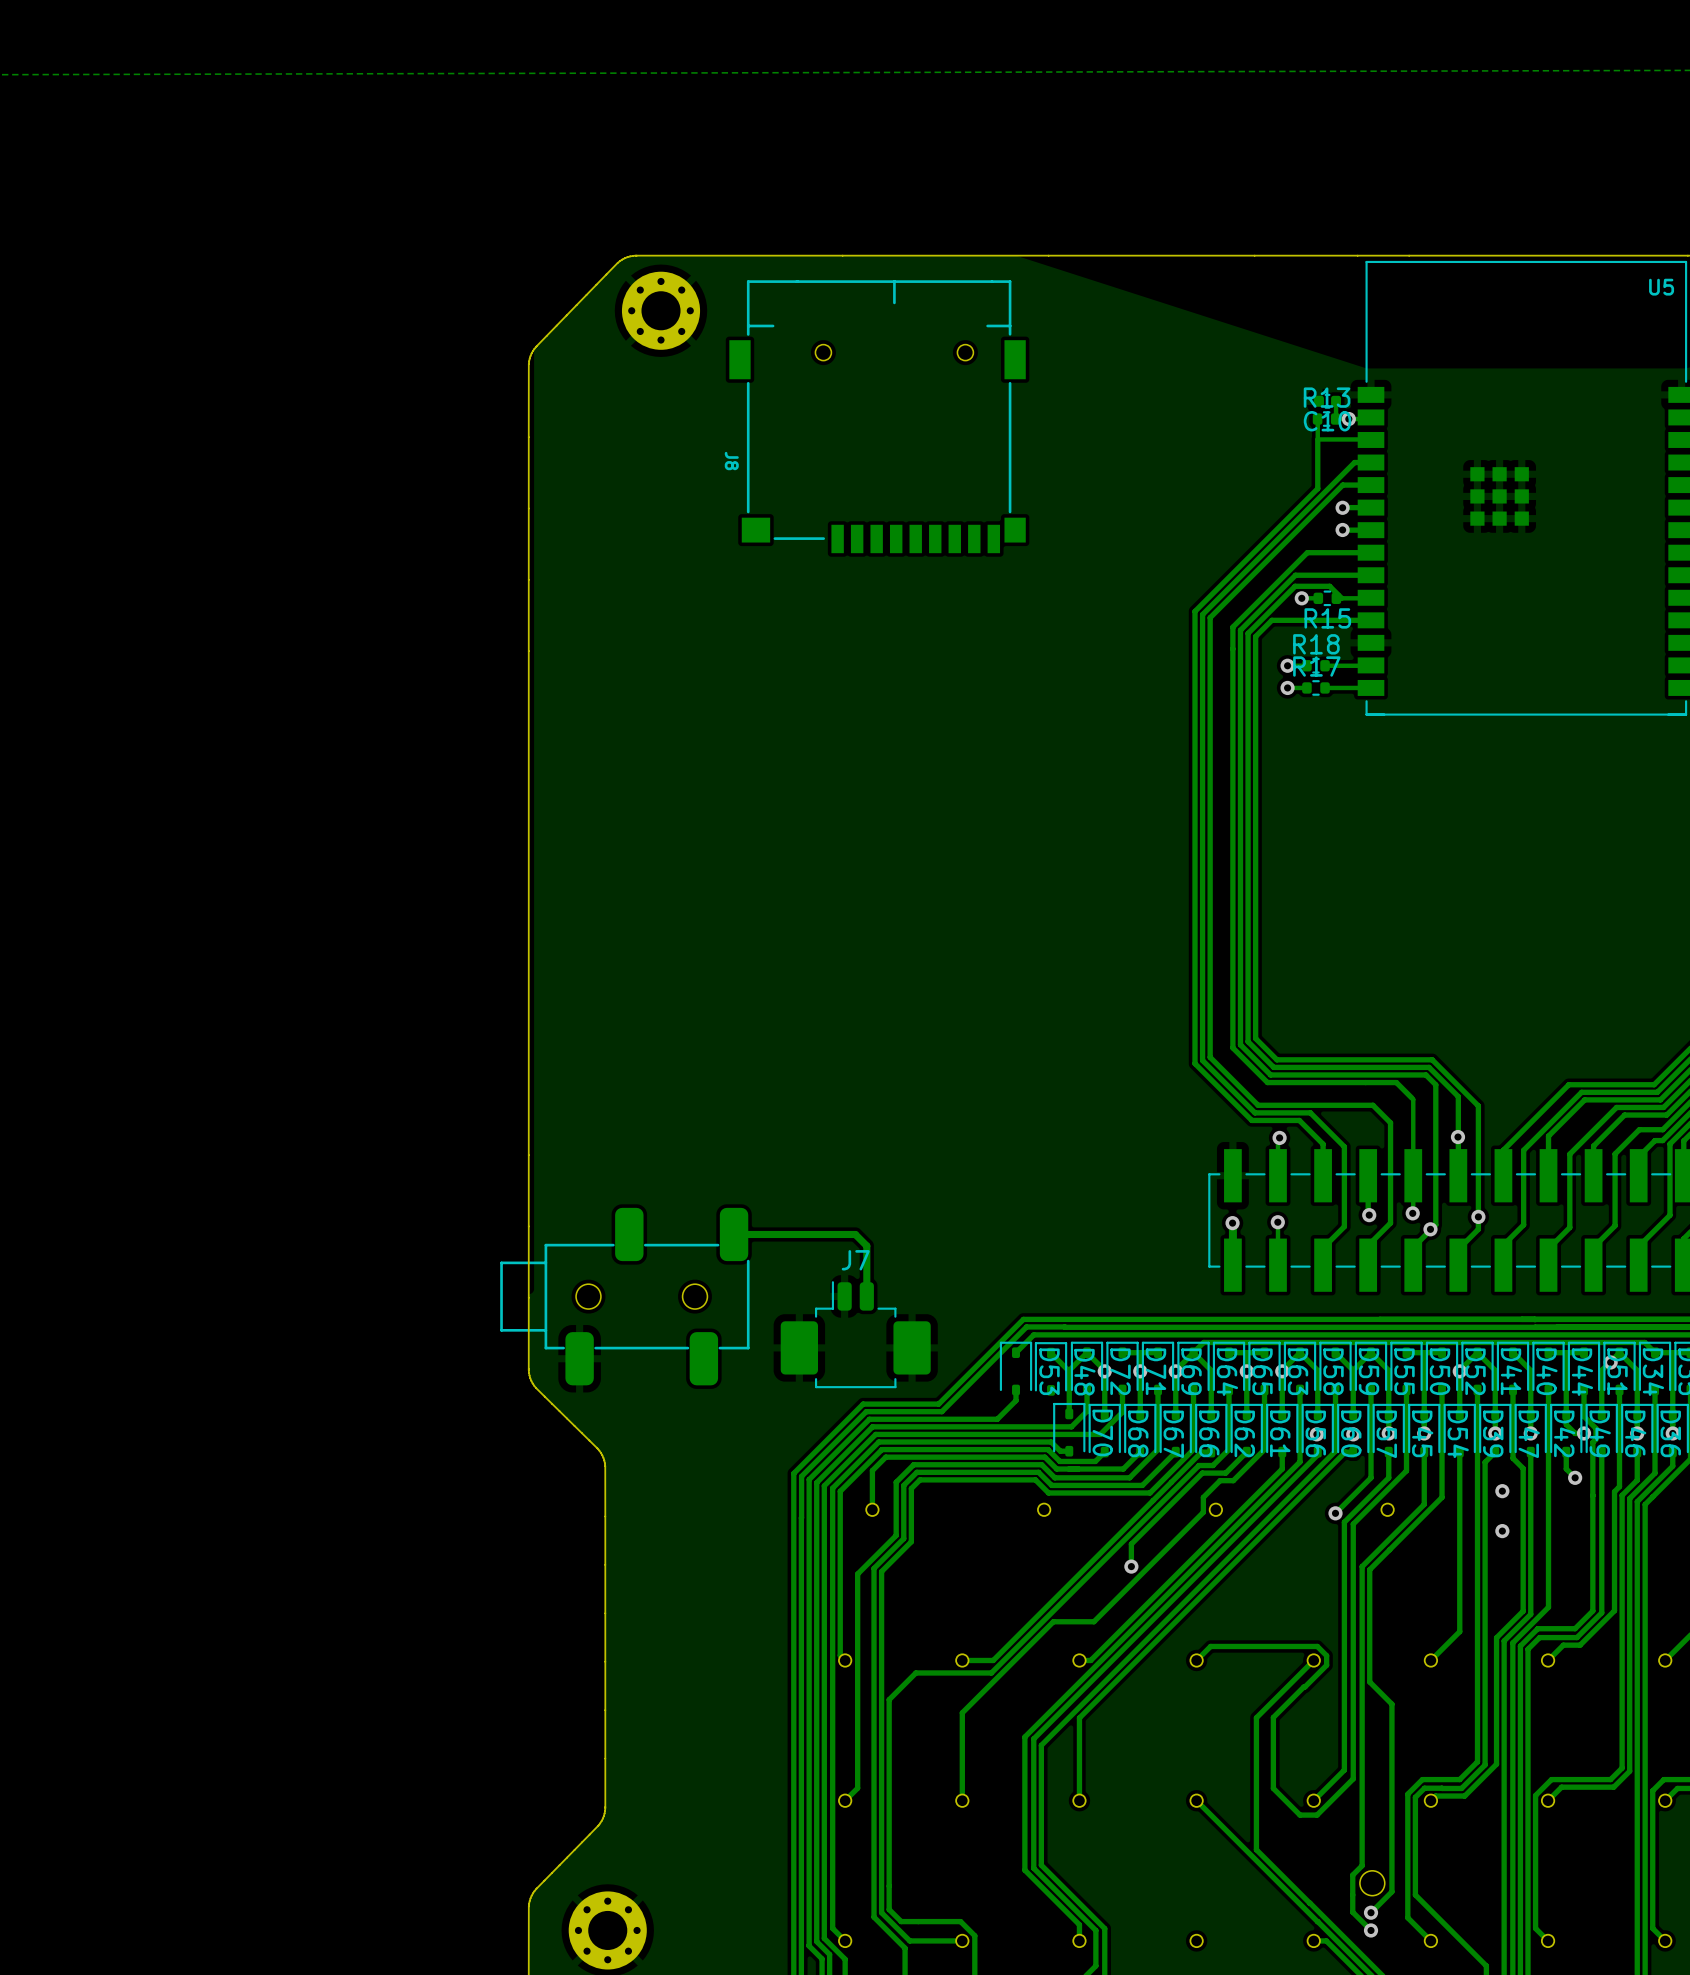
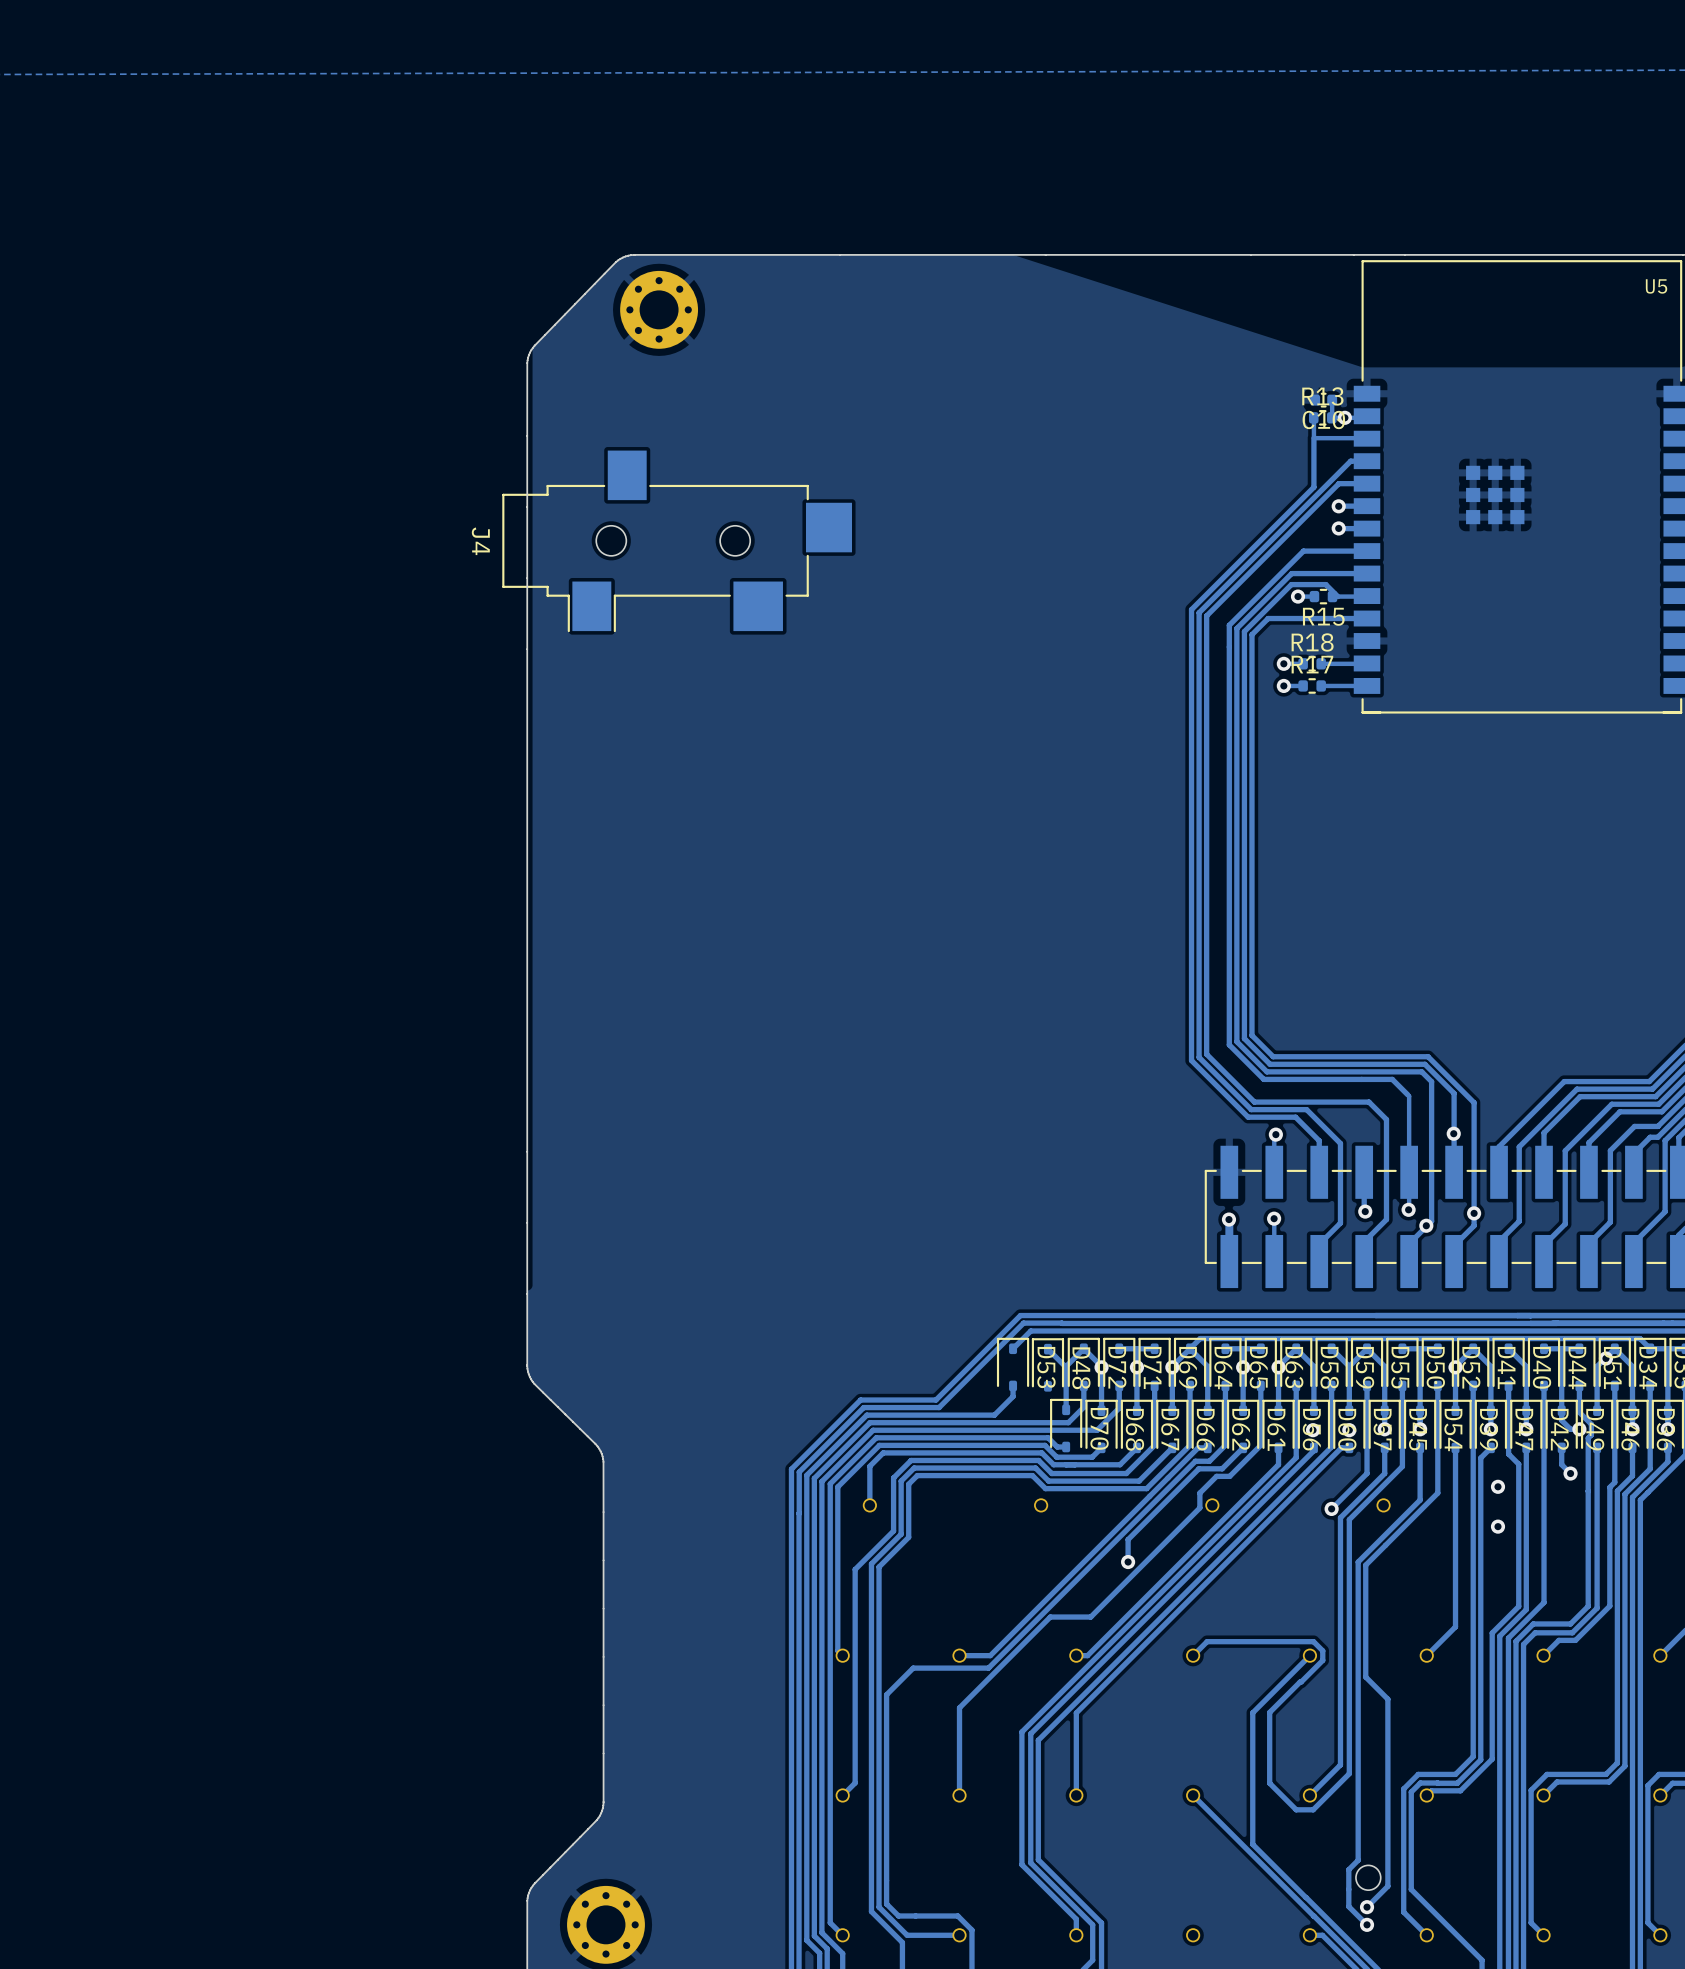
J8: (877, 416) -> none
J4: none -> (677, 541)
track: (734, 1234) (855, 1234) (866, 1245) (866, 1296) -> none
part: (624, 1296) -> none
J7: (855, 1334) -> none

